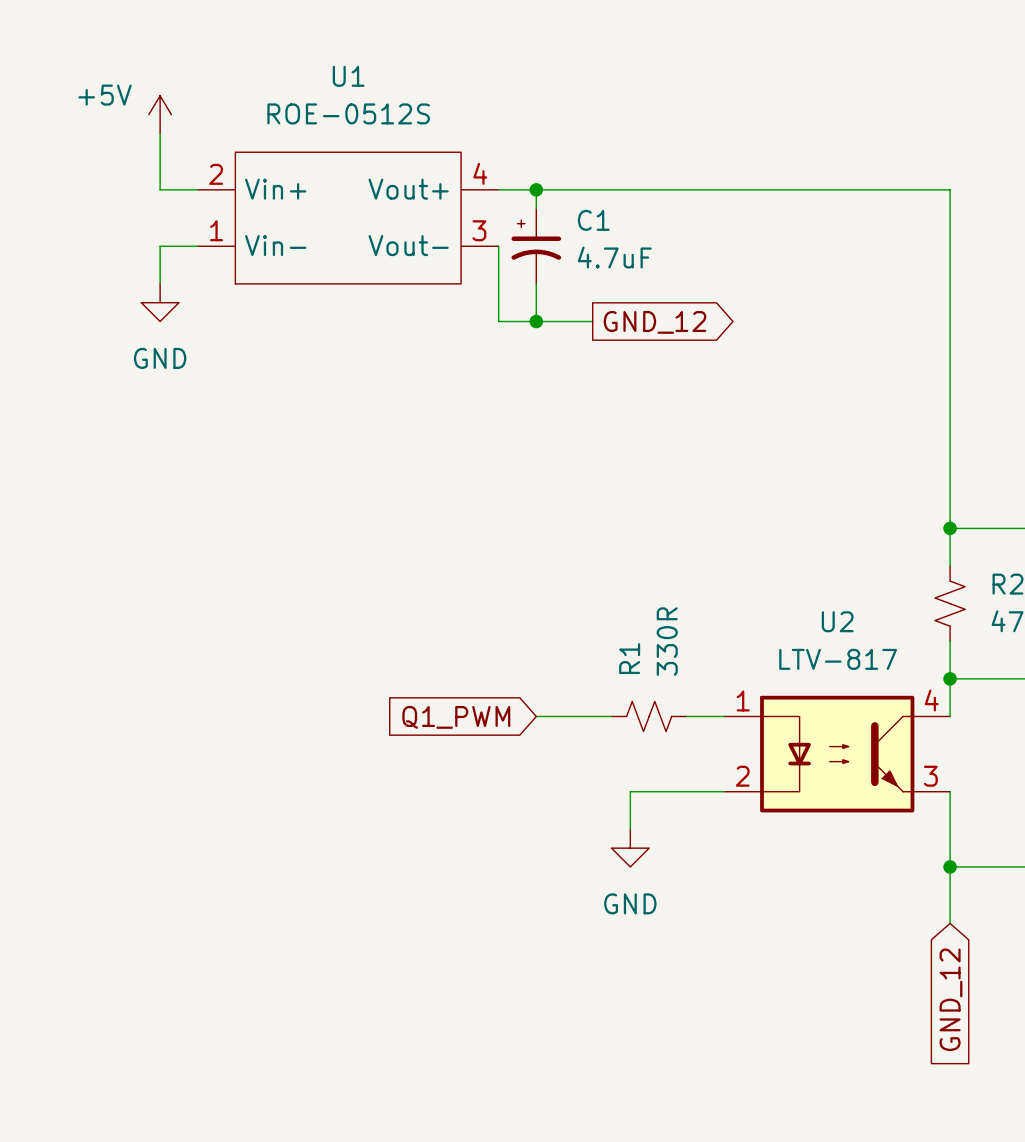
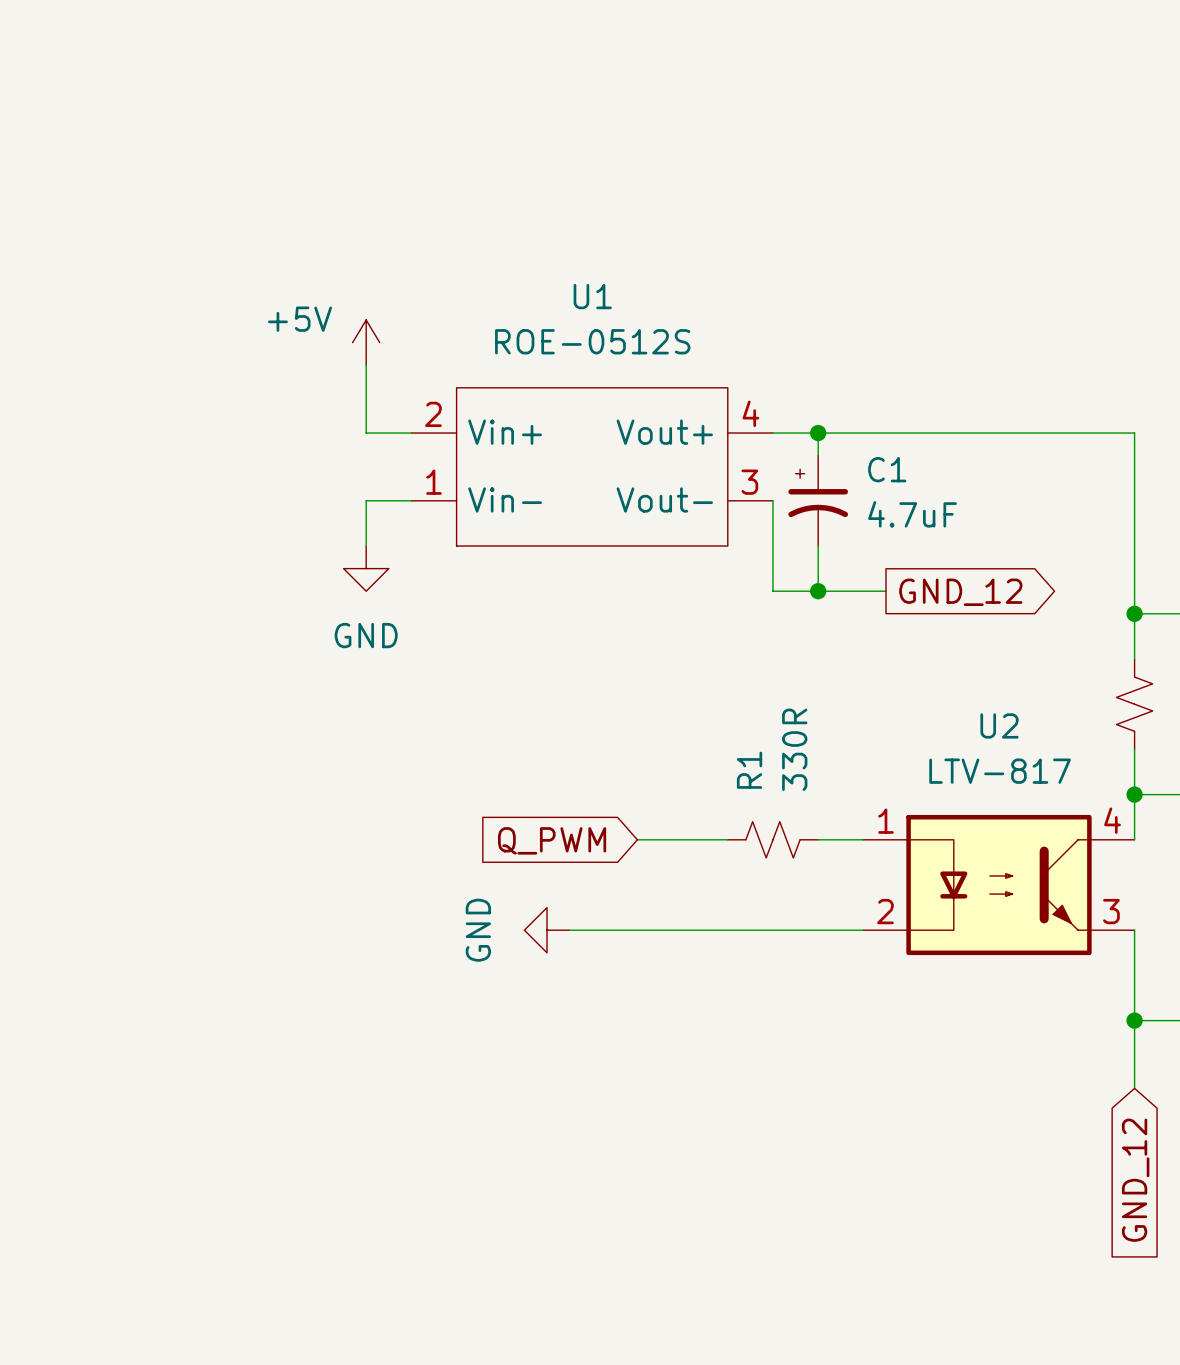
power symbol position: +5V (160, 114) -> +5V (366, 342)
wire: (160, 133) (160, 189) (197, 189) -> (366, 365) (366, 433) (411, 433)
wire: (498, 189) (950, 189) (950, 377) -> (772, 433) (1134, 433)
wire: (536, 189) (536, 208) -> (818, 433) (818, 455)
junction: (536, 189) -> none
U1 position: (348, 218) -> (592, 466)
wire: (197, 246) (160, 246) (160, 283) -> (411, 500) (366, 500) (366, 546)
wire: (498, 246) (498, 321) (592, 321) -> (772, 500) (772, 591) (885, 591)
C1 position: (536, 246) -> (818, 500)
wire: (536, 283) (536, 321) -> (818, 546) (818, 591)
power symbol: GND (160, 302) -> none
junction: (536, 321) -> none
global label position: GND_12 (654, 322) -> GND_12 (960, 592)
junction: none -> (818, 433)
power symbol: none -> GND (366, 568)
junction: none -> (818, 591)
global label: Q1_PWM (456, 717) -> Q_PWM (552, 840)
wire: (630, 791) (630, 829) -> (750, 930) (569, 930)
power symbol rotation: 0° (630, 848) -> 90° clockwise (546, 930)
power symbol position: GND (630, 848) -> GND (546, 930)

